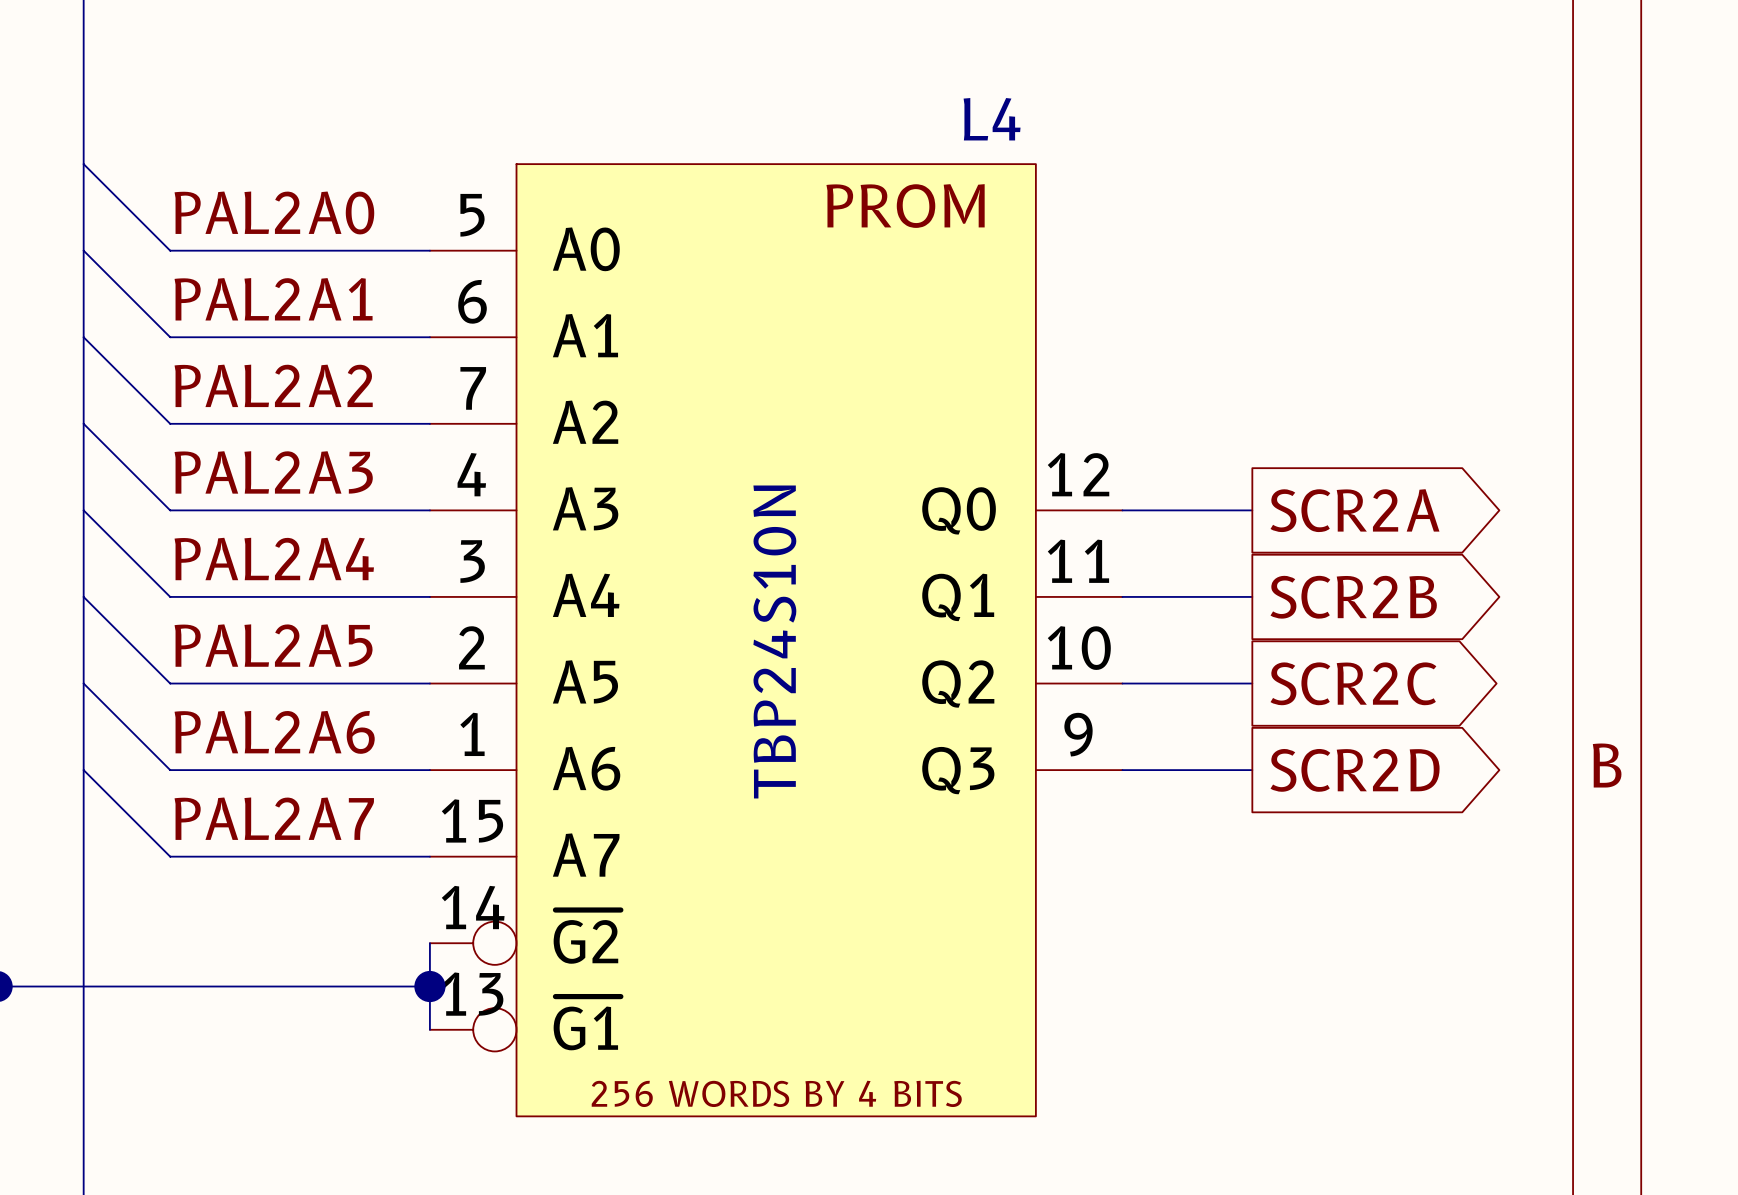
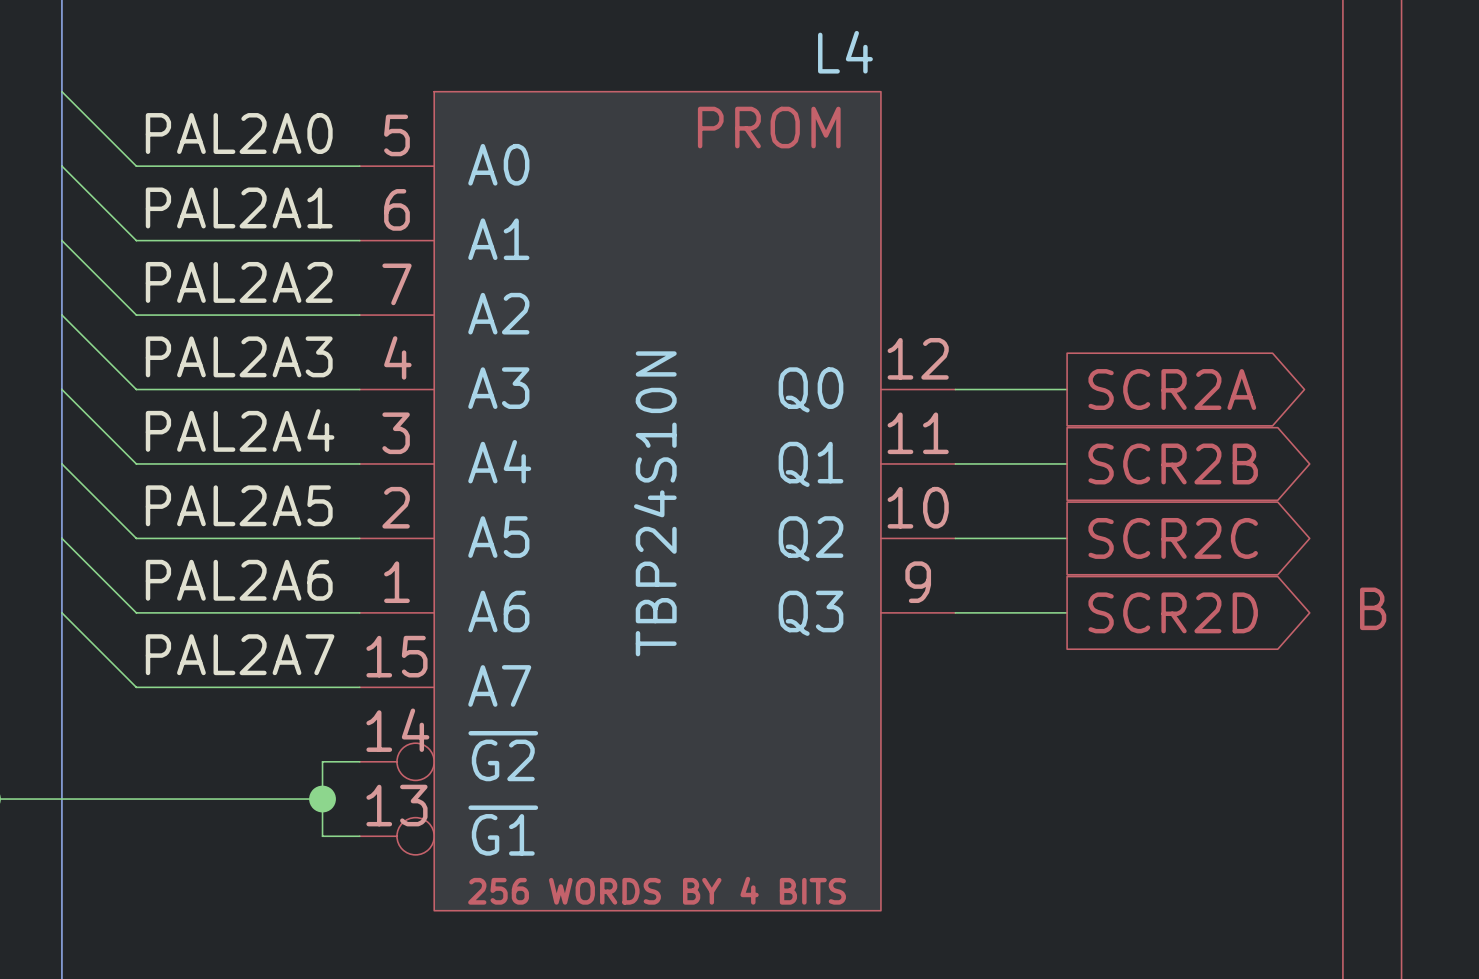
wire: (429, 943) (429, 1029) -> (359, 761) (322, 761) (322, 836) (359, 836)
wire: (386, 986) (429, 986) -> none
junction position: (429, 986) -> (322, 799)

